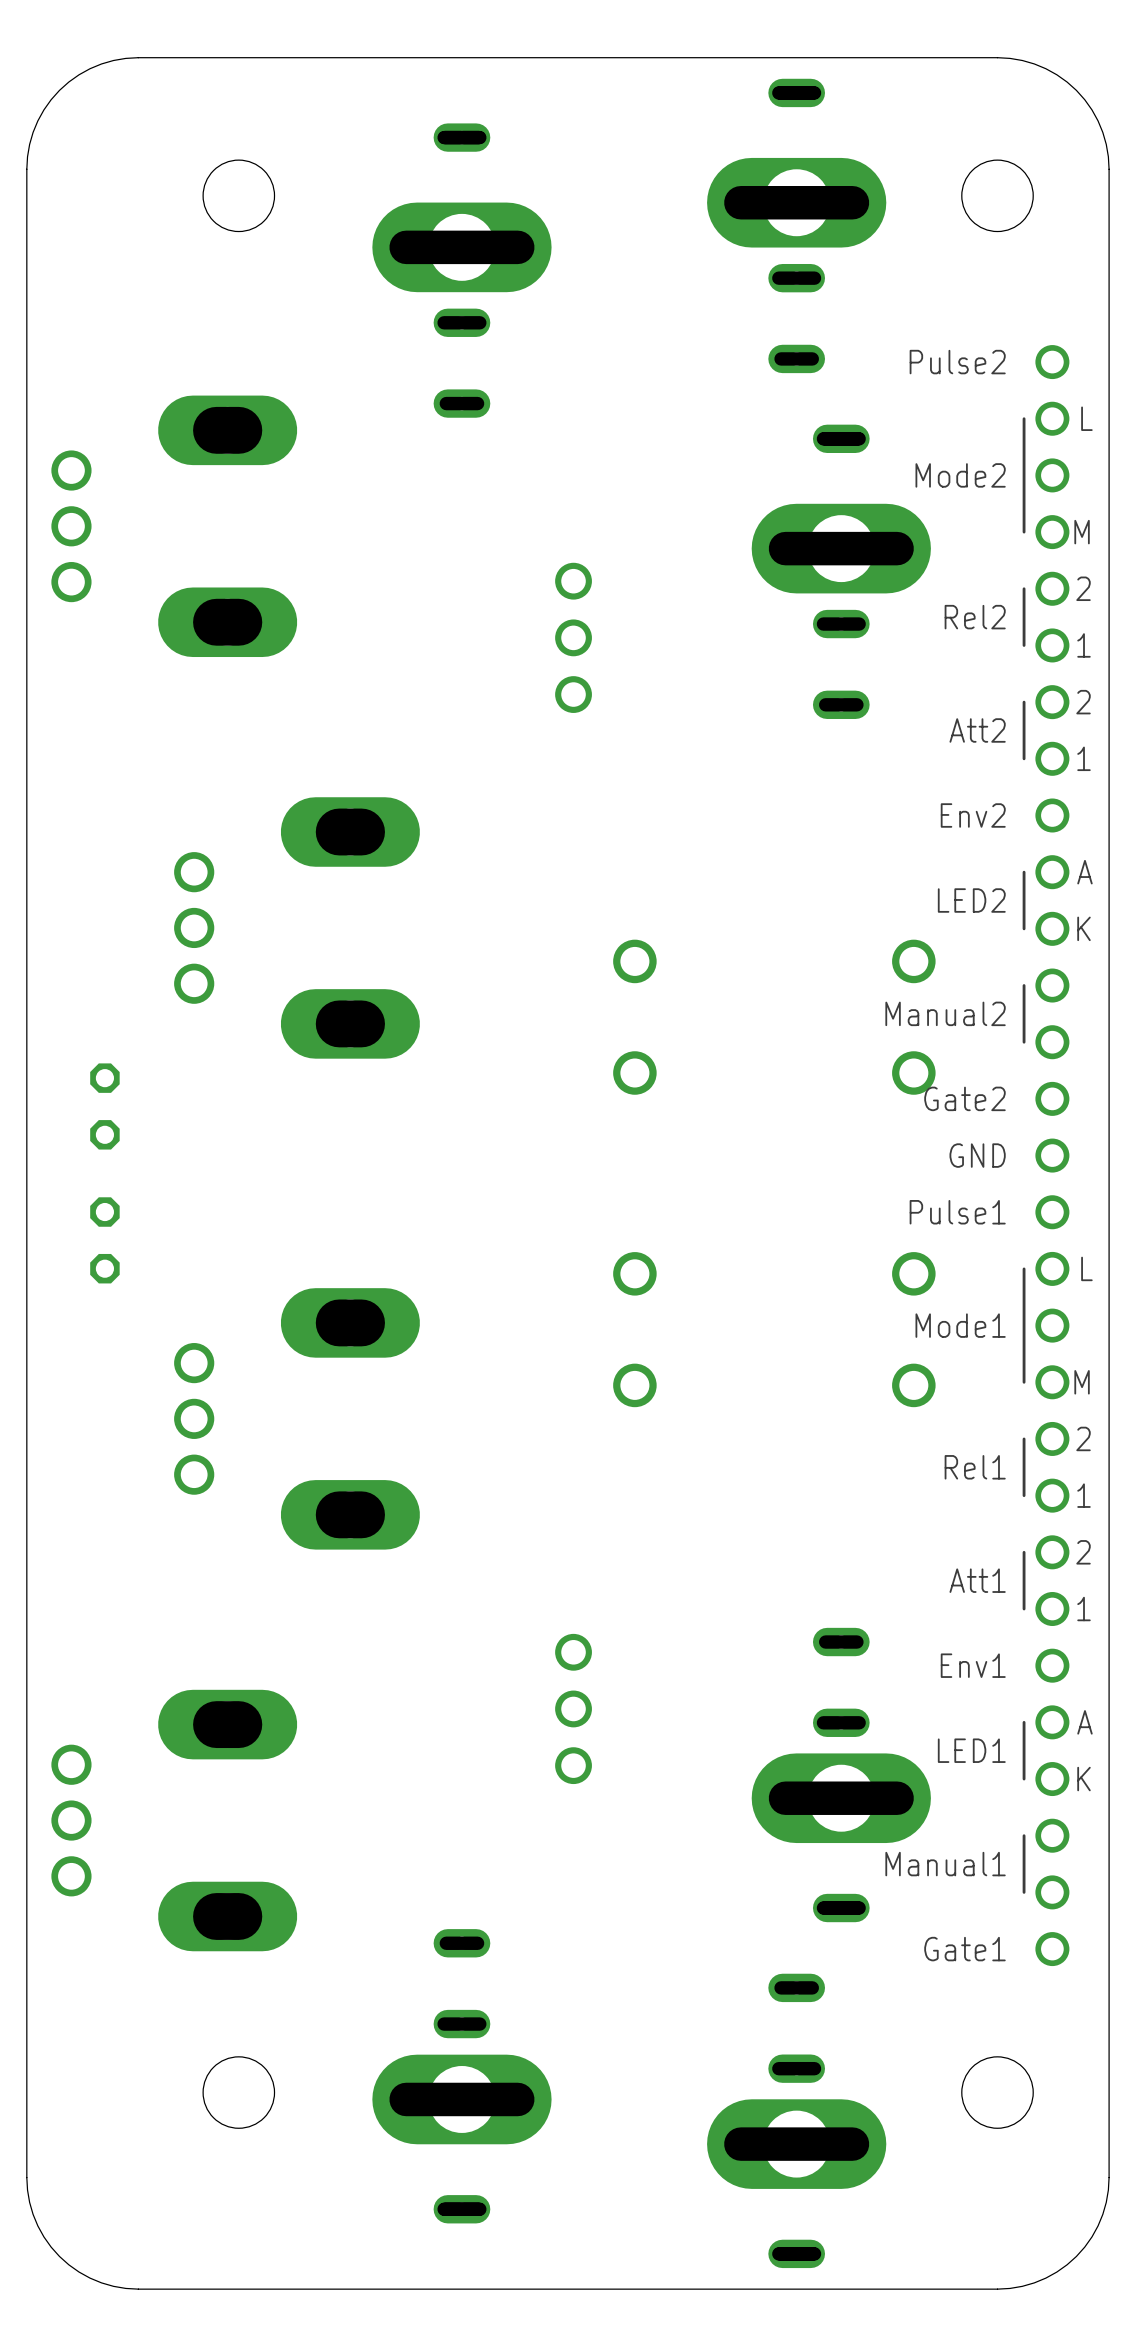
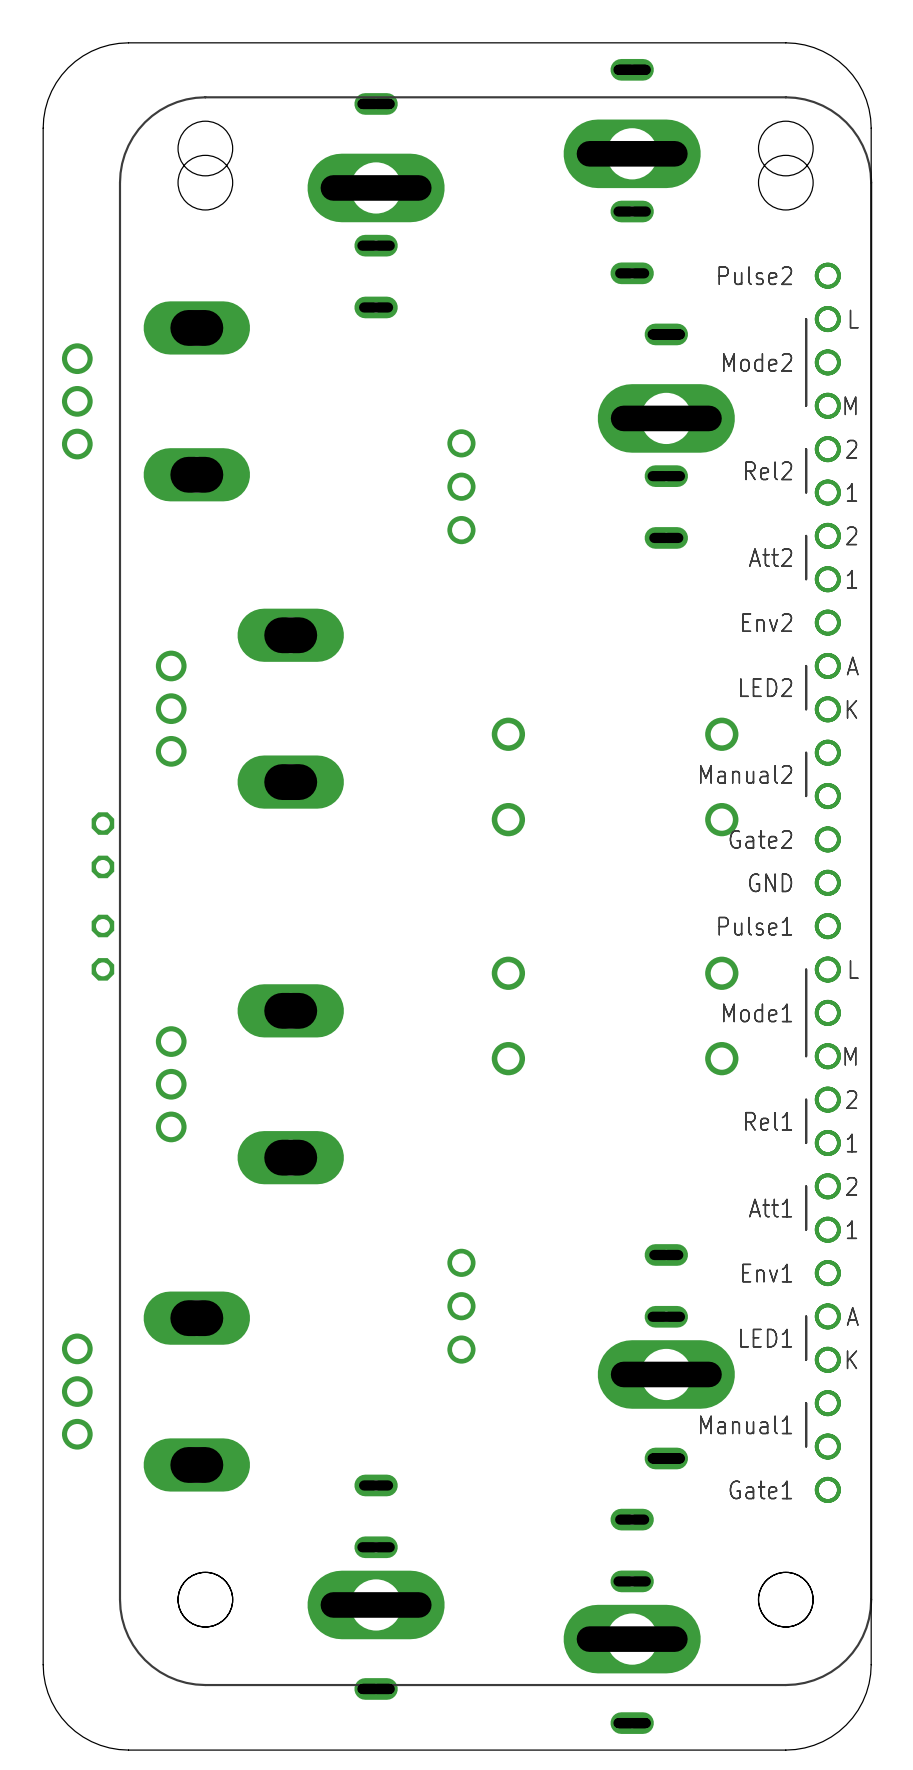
part: none -> (495, 891)

